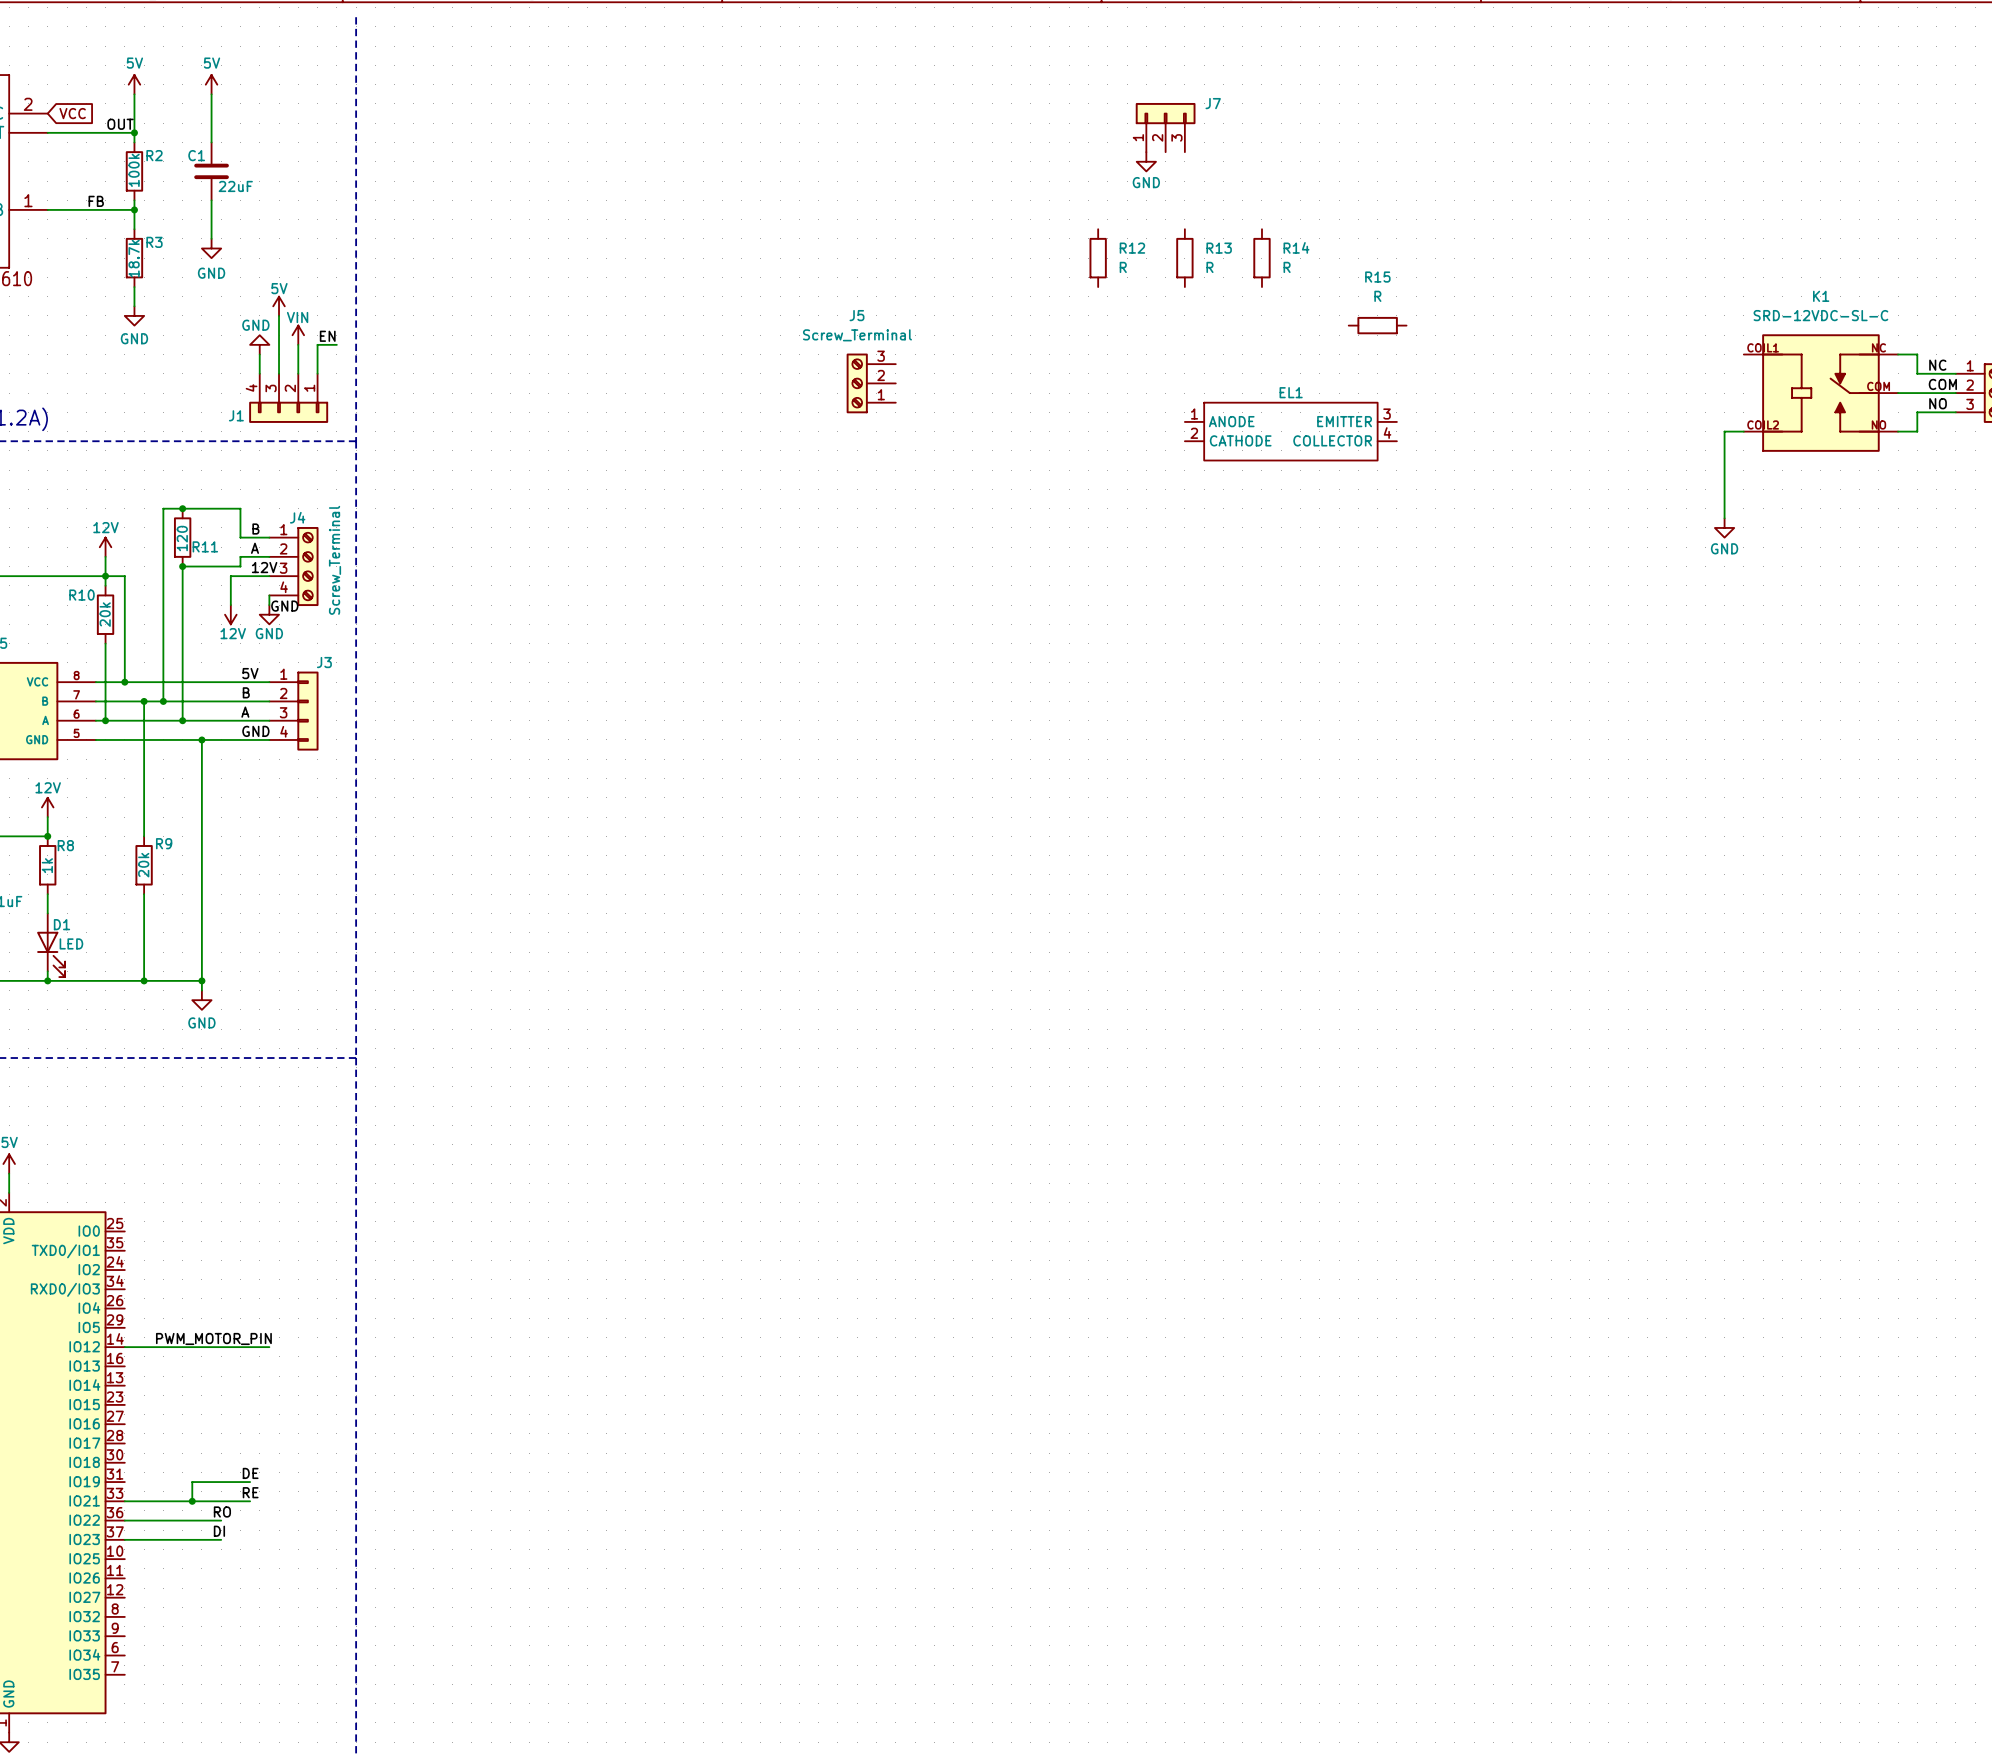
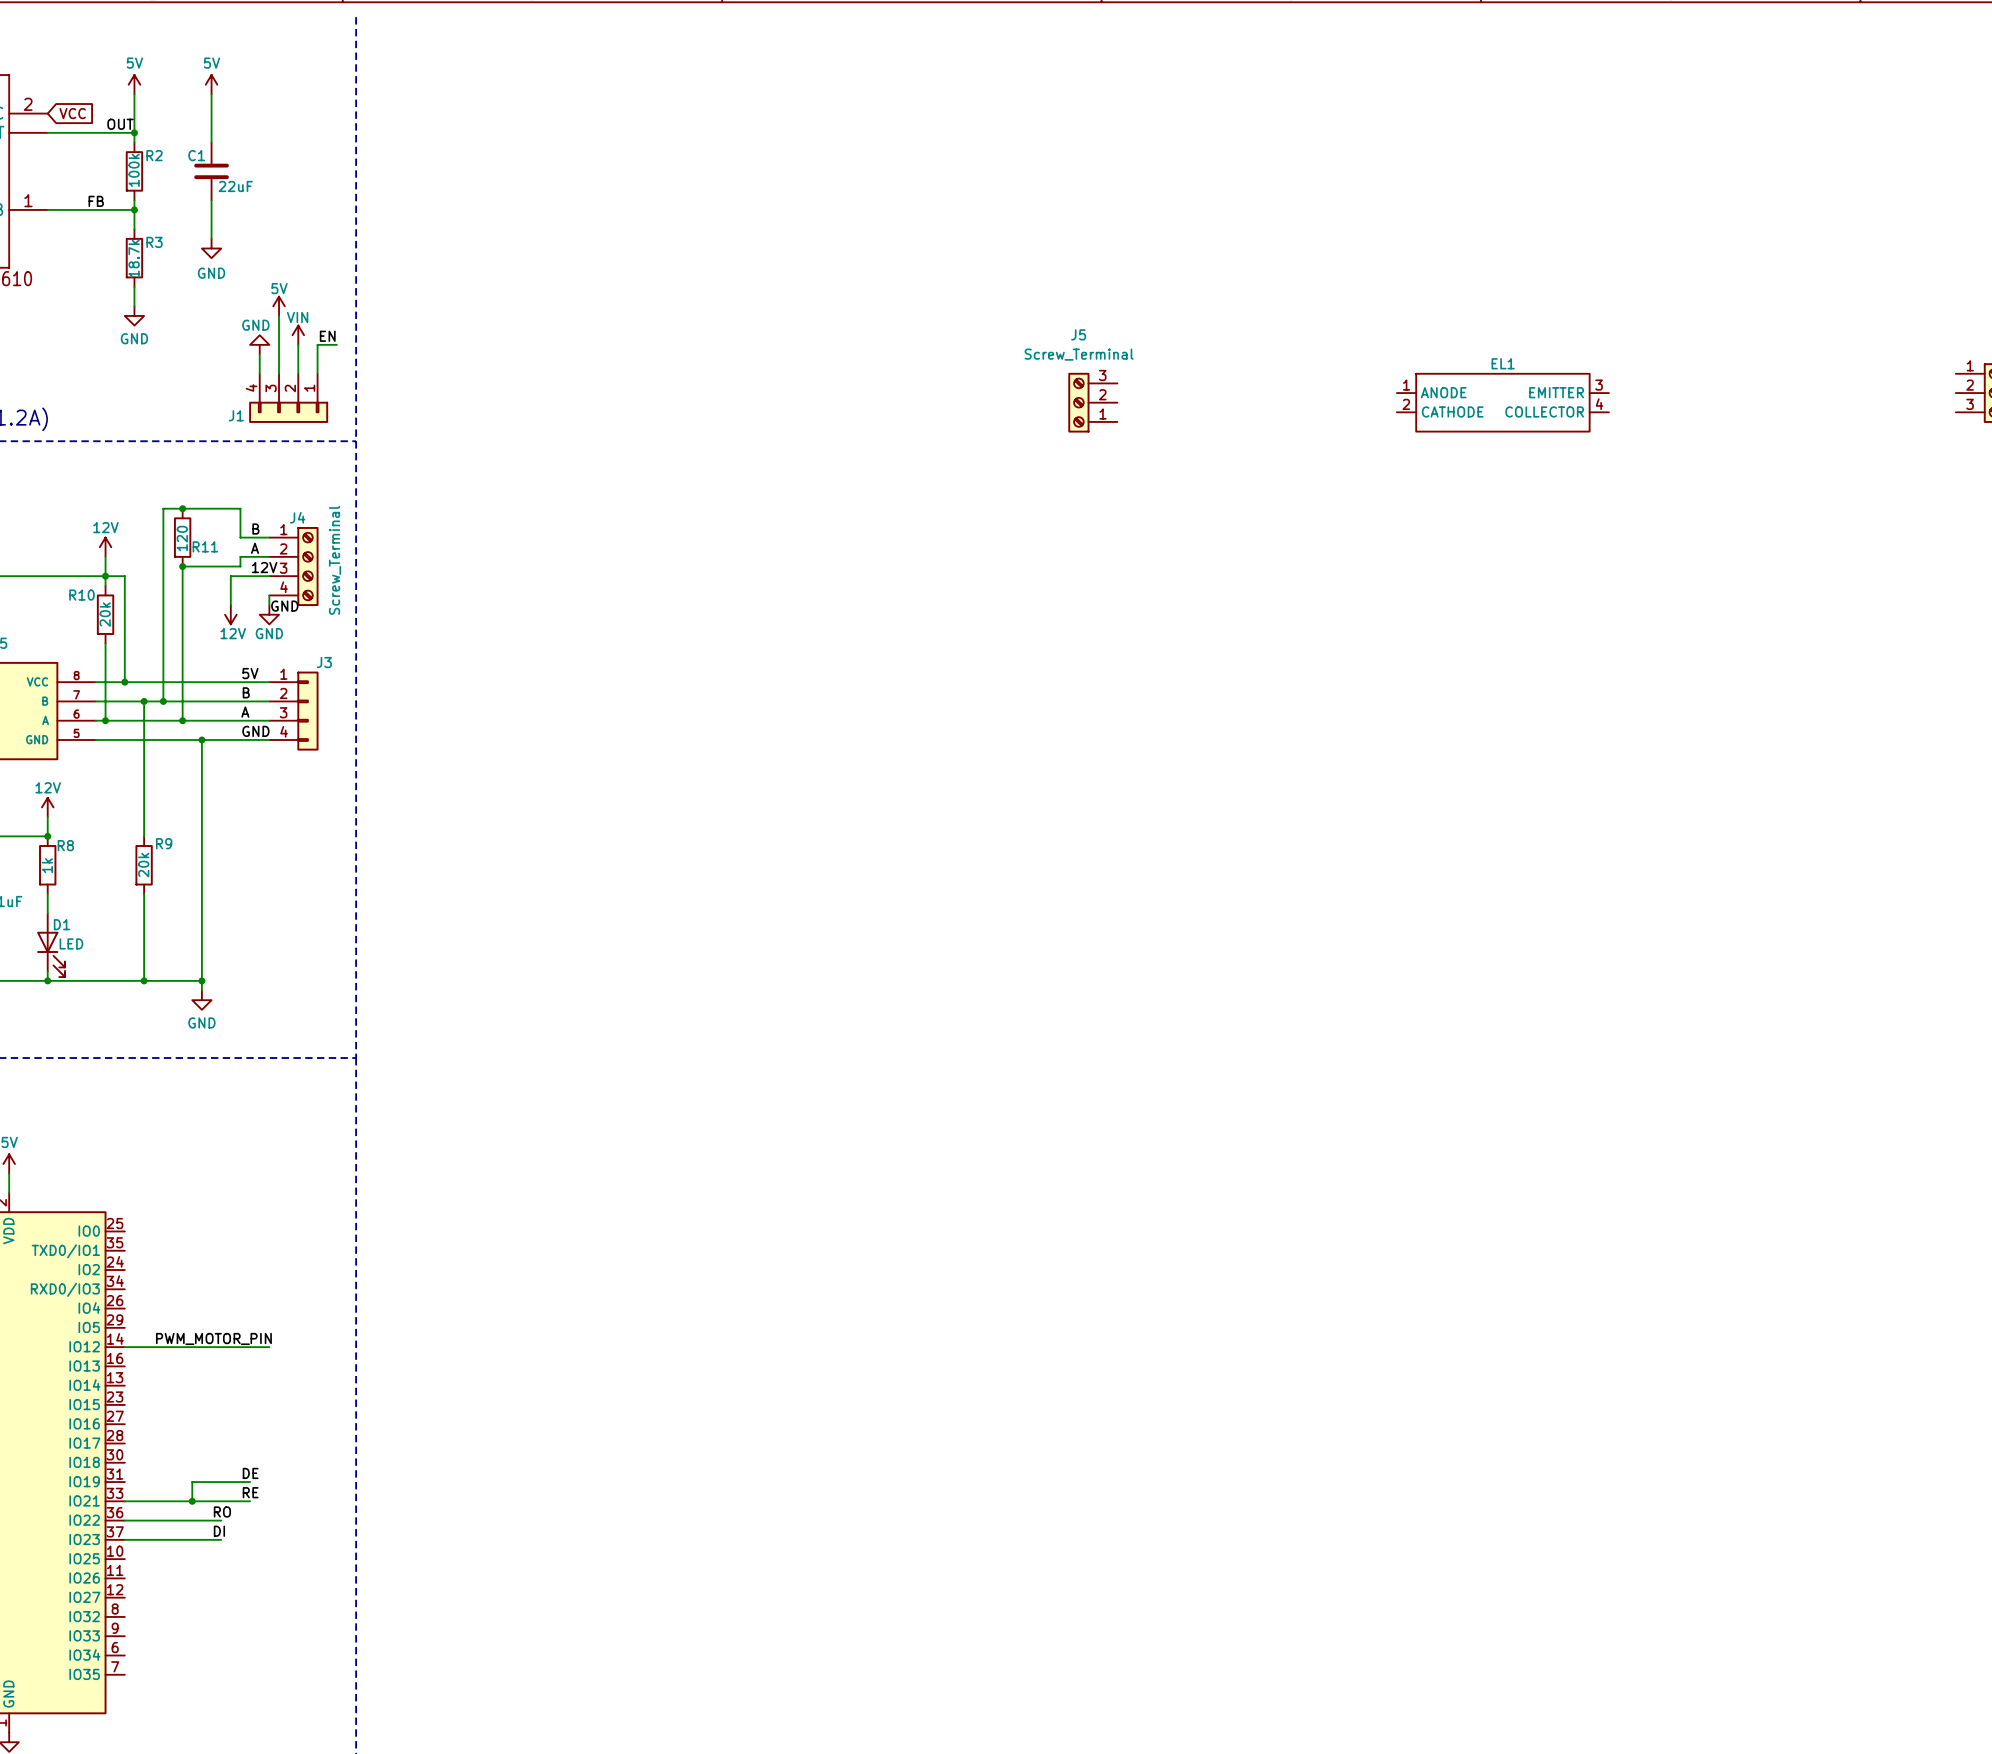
J7: (1165, 127) -> none
power symbol: GND (1146, 161) -> none
R12: R (1098, 258) -> none
R13: R (1184, 258) -> none
R14: R (1261, 258) -> none
R15: R (1377, 325) -> none
wire: (1898, 354) (1917, 354) (1917, 373) (1955, 373) -> none
label: NC (1937, 365) -> none
J5 position: (871, 383) -> (1092, 402)
label: COM (1942, 384) -> none
K1: SRD-12VDC-SL-C (1820, 393) -> none
wire: (1898, 393) (1955, 393) -> none
label: NO (1938, 403) -> none
wire: (1955, 412) (1917, 412) (1917, 431) (1898, 431) -> none
EL1 position: (1290, 431) -> (1502, 402)
wire: (1743, 431) (1724, 431) (1724, 518) -> none
power symbol: GND (1724, 527) -> none

